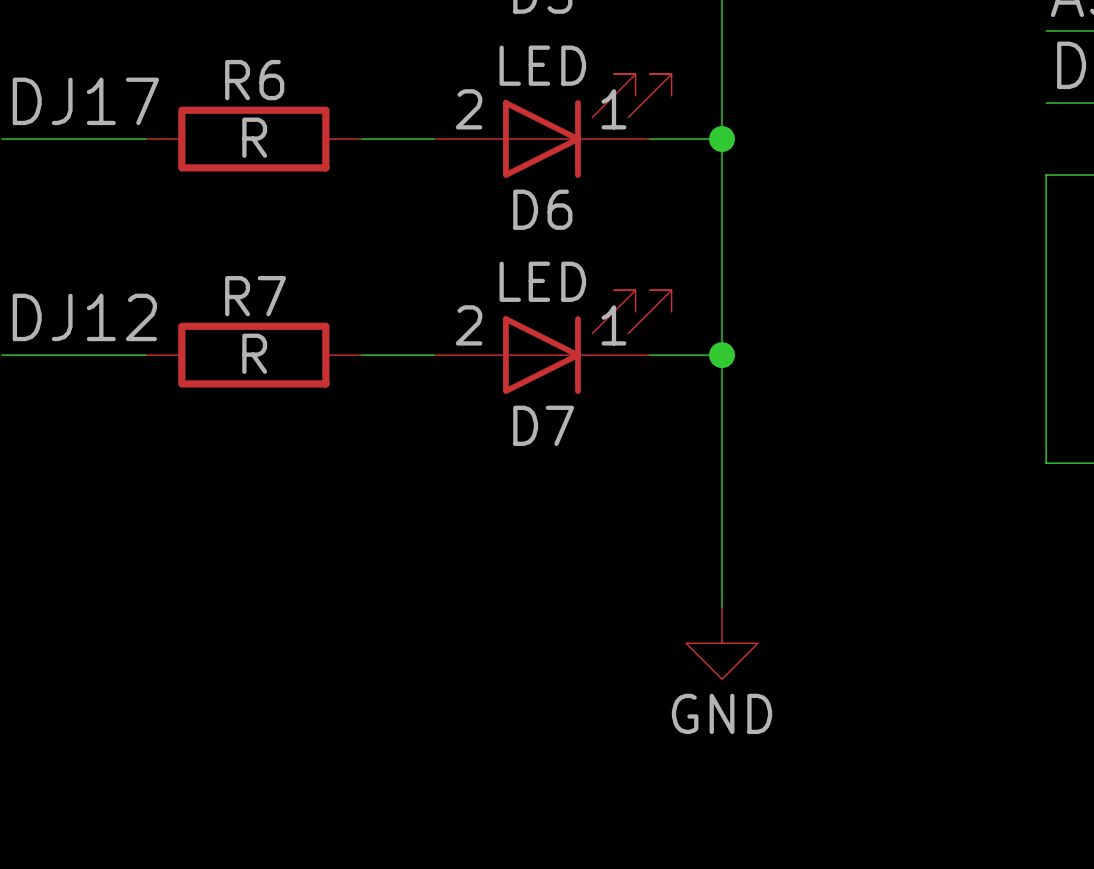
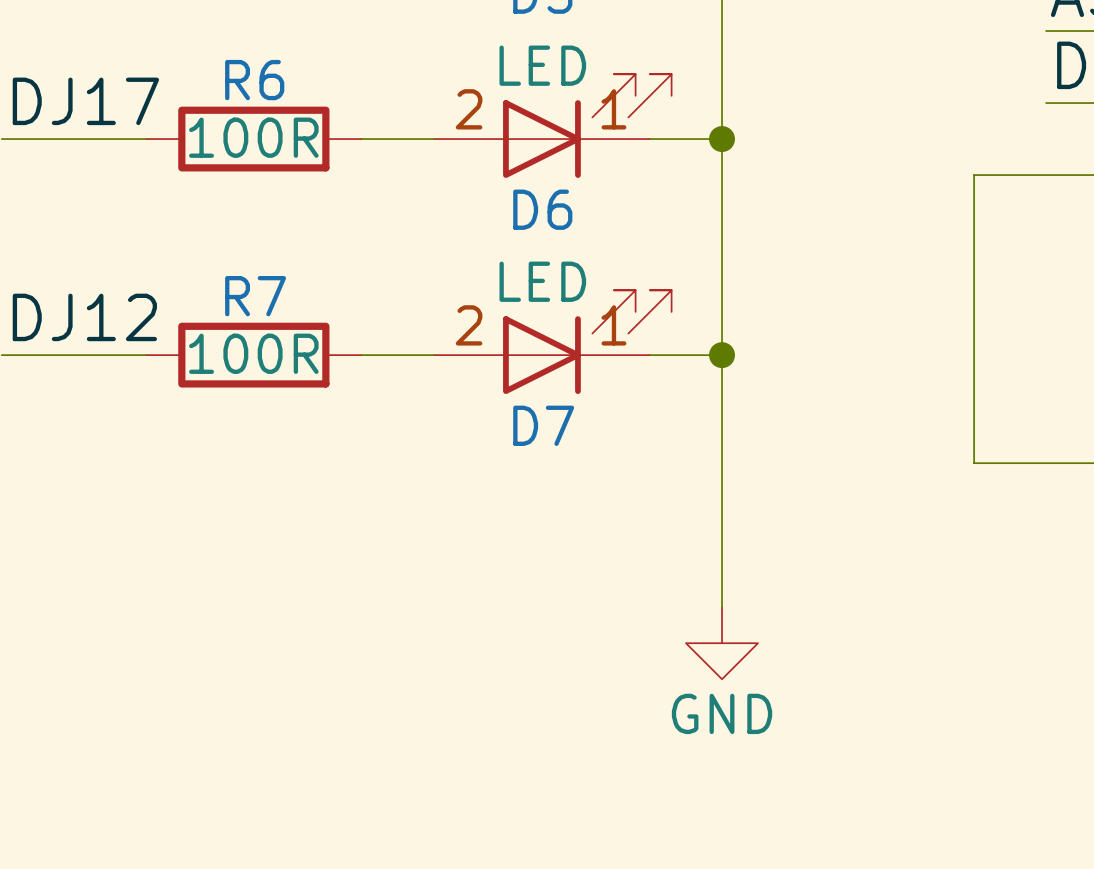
R6 value: R (254, 137) -> 100R (253, 137)
wire: (1046, 175) (1046, 463) -> (1046, 175) (974, 175) (974, 463) (1046, 463)
R7 value: R (254, 353) -> 100R (253, 353)

